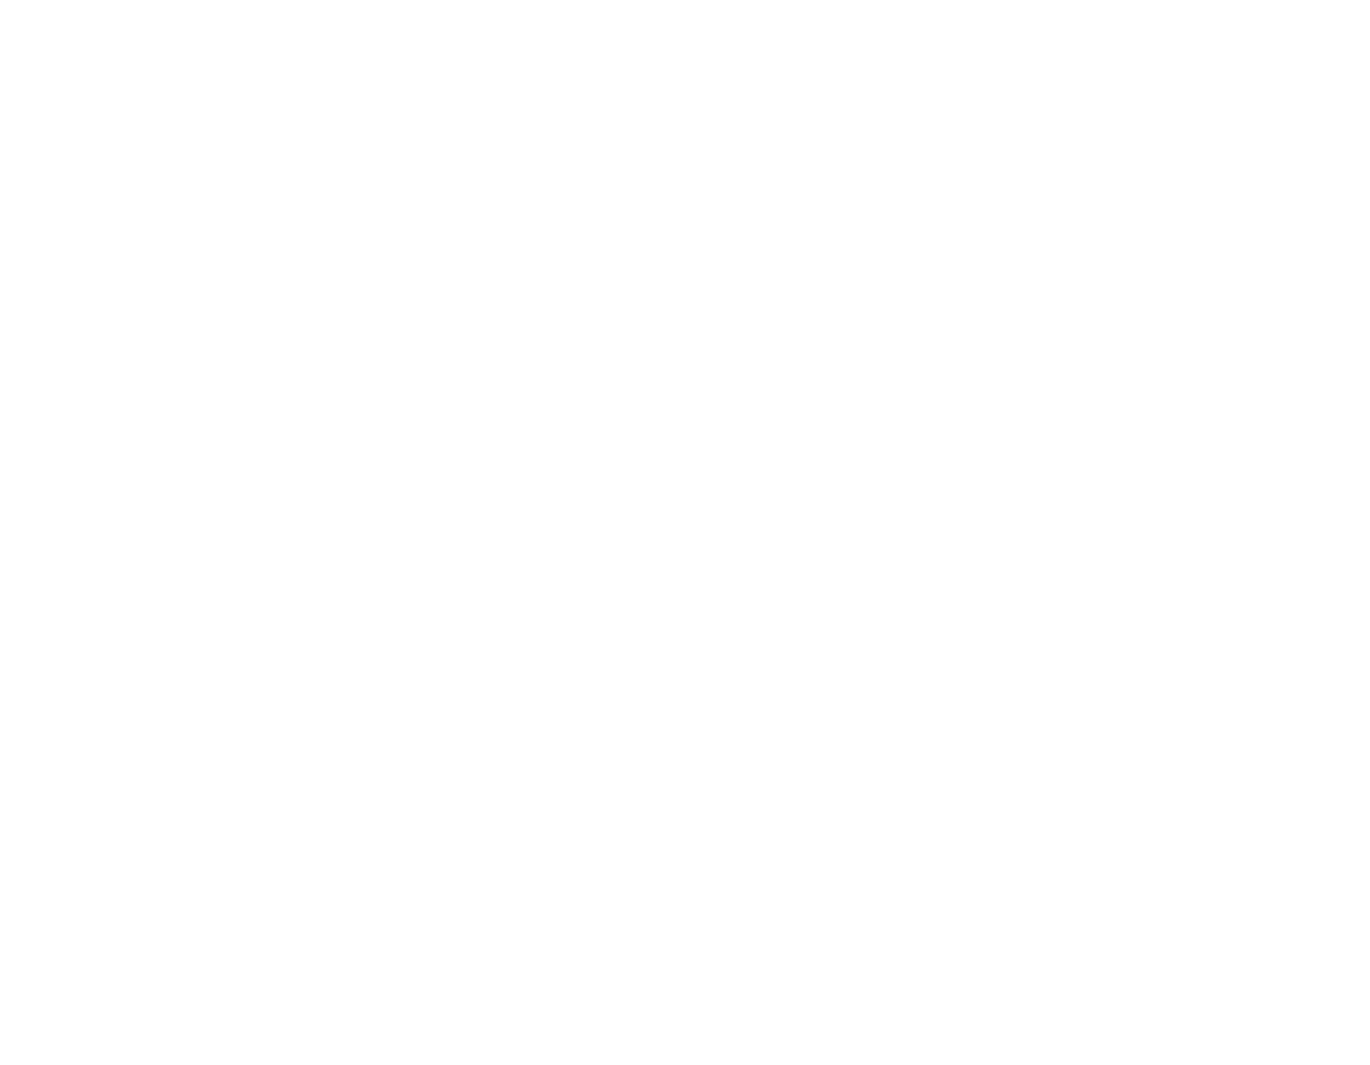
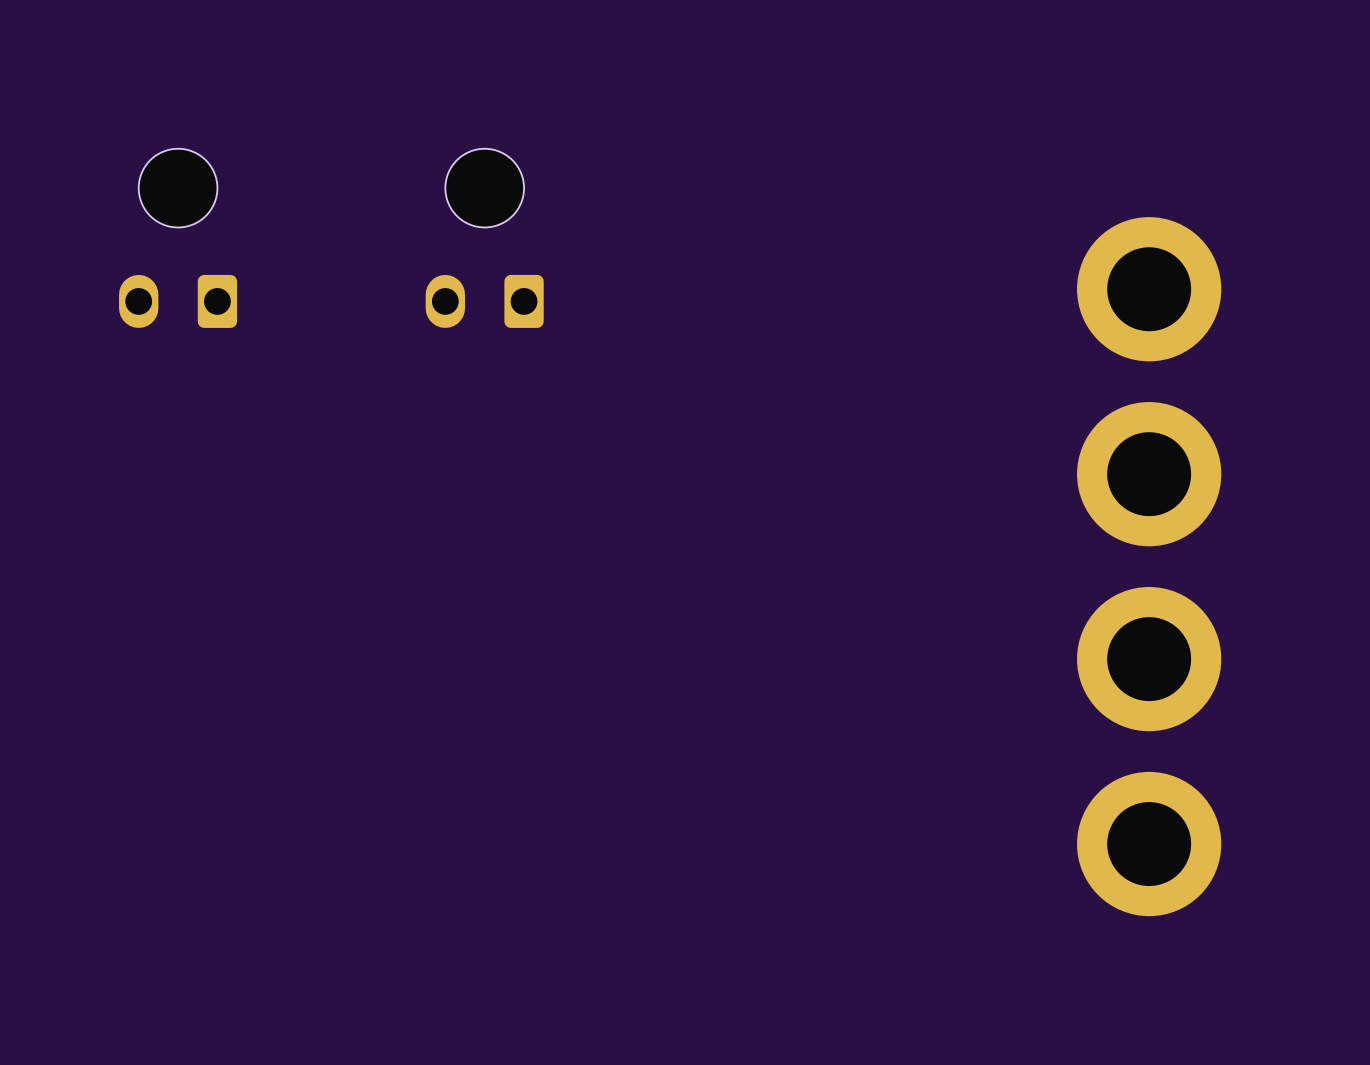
part: none -> (178, 238)
part: none -> (484, 238)
part: none -> (1149, 289)
part: none -> (1149, 474)
part: none -> (1149, 659)
part: none -> (1149, 844)

